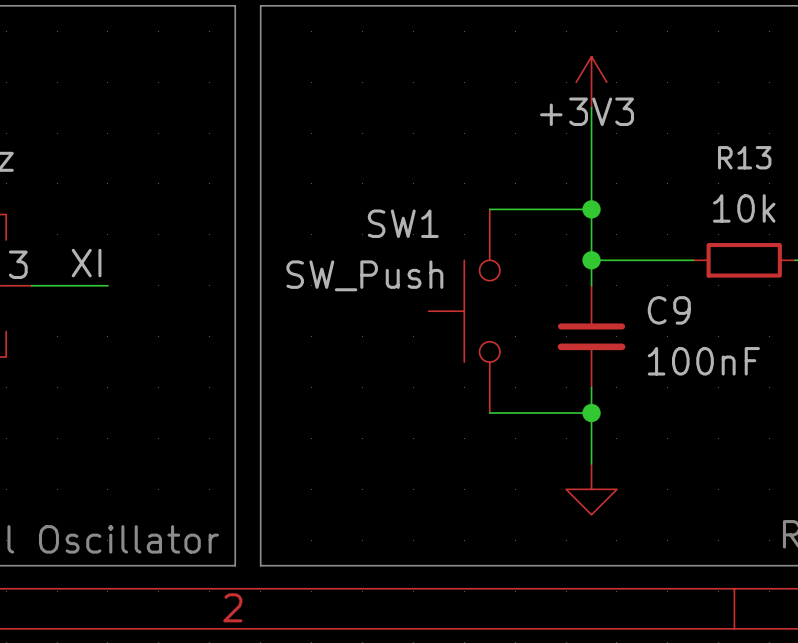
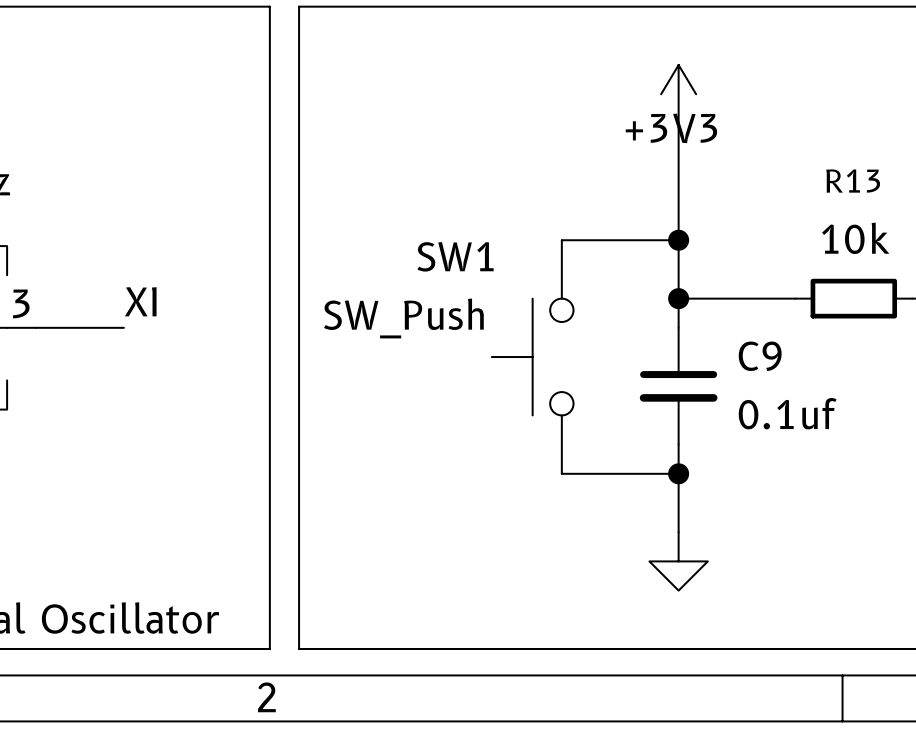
label position: XI (86, 263) -> XI (140, 301)
C9 value: 100nF (703, 361) -> 0.1uf (787, 413)

